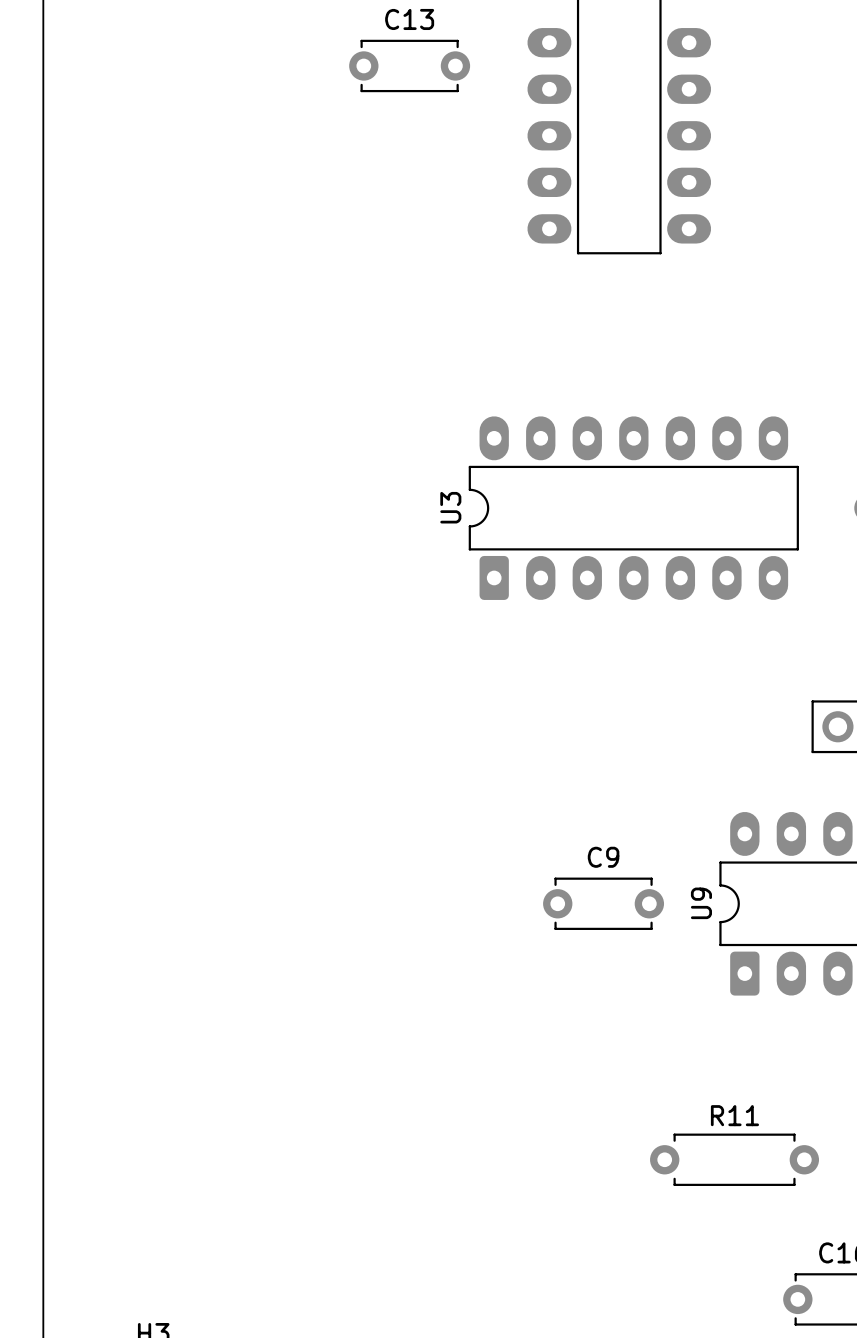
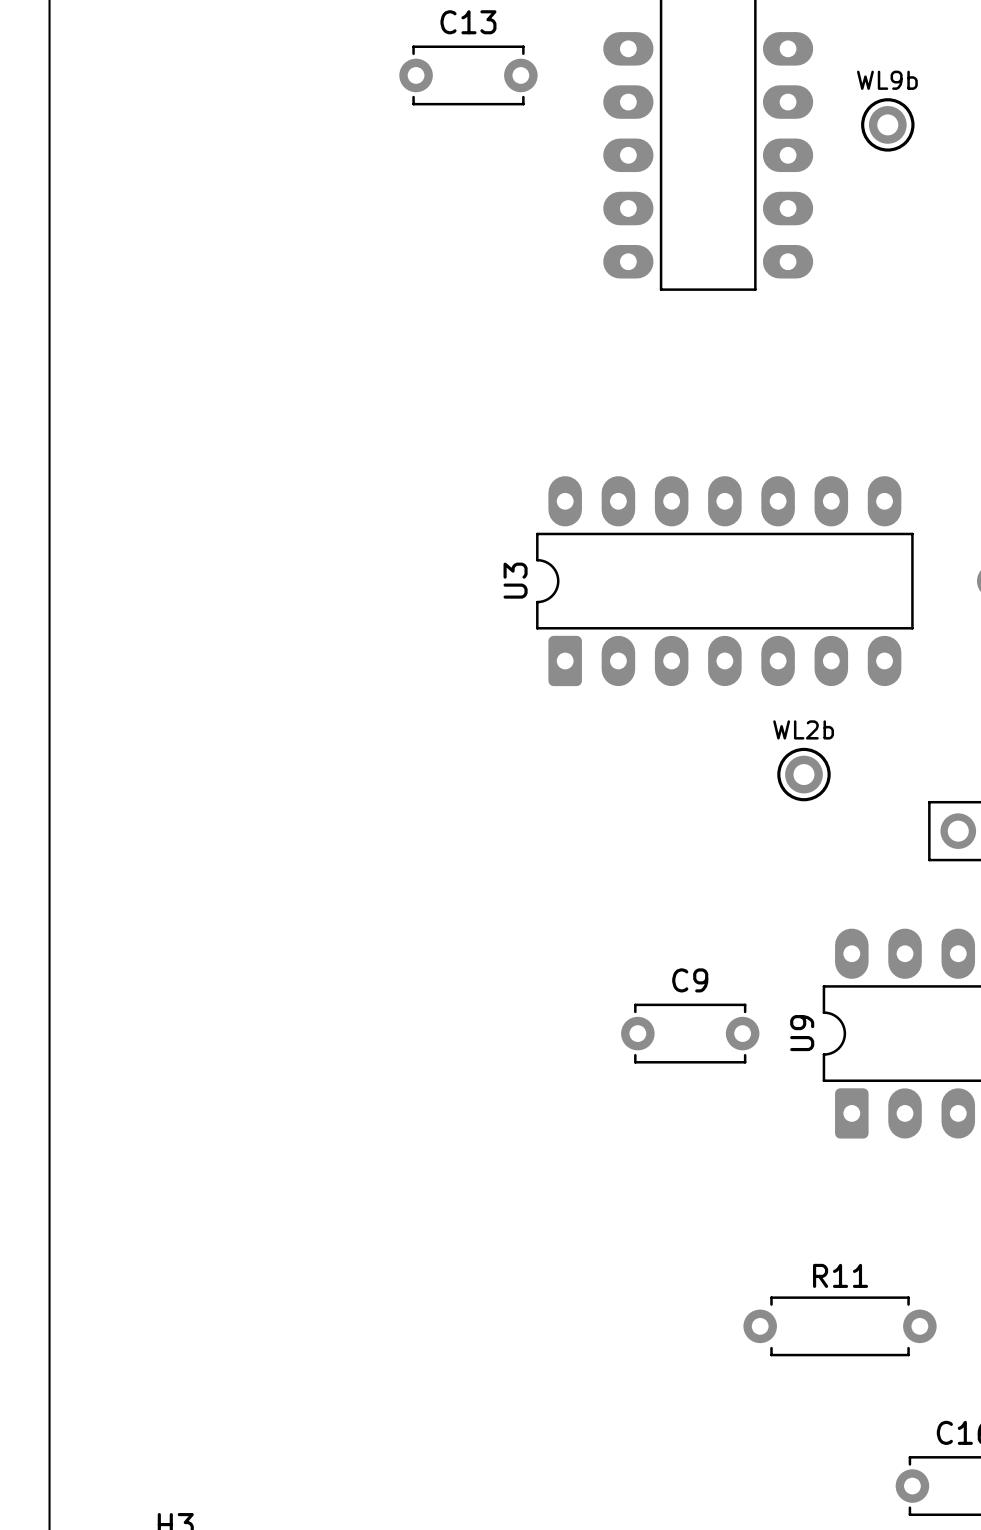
WL9b: none -> (887, 124)
WL2b: none -> (803, 774)

